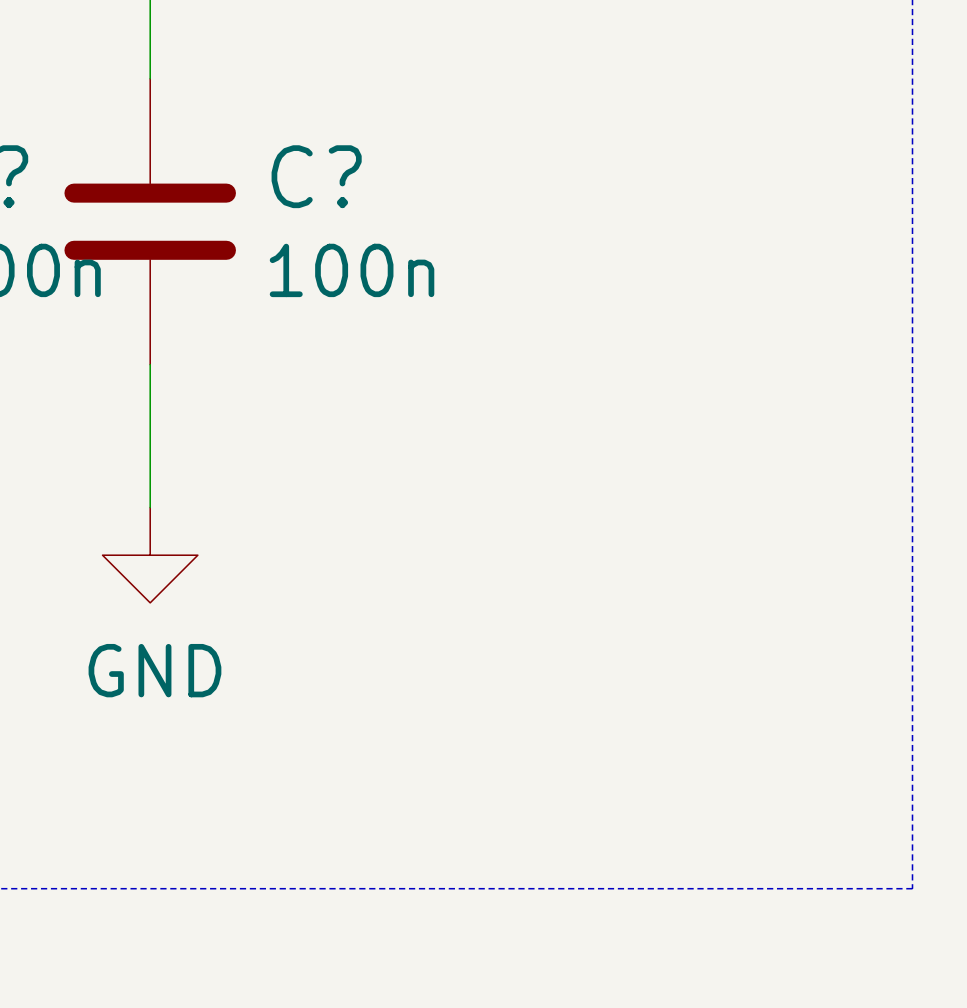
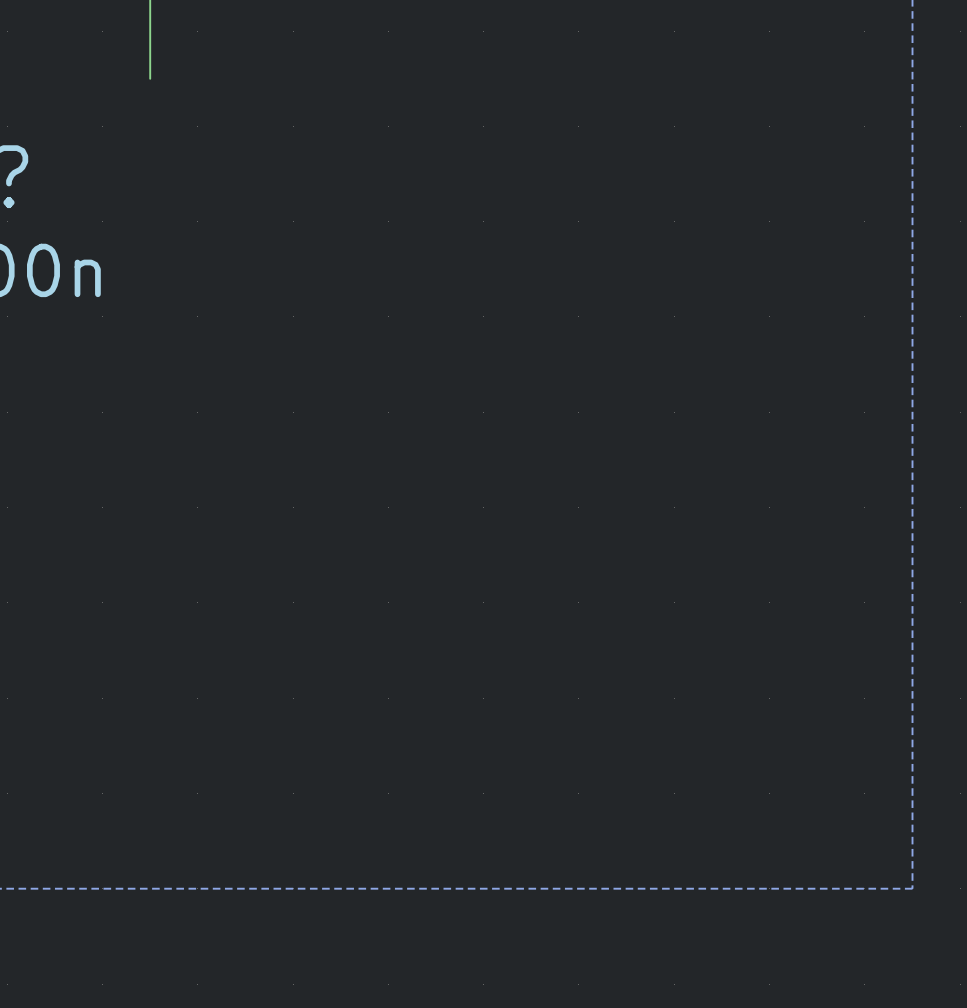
C?: (150, 221) -> none
wire: (150, 364) (150, 507) -> none
power symbol: GND (150, 555) -> none

